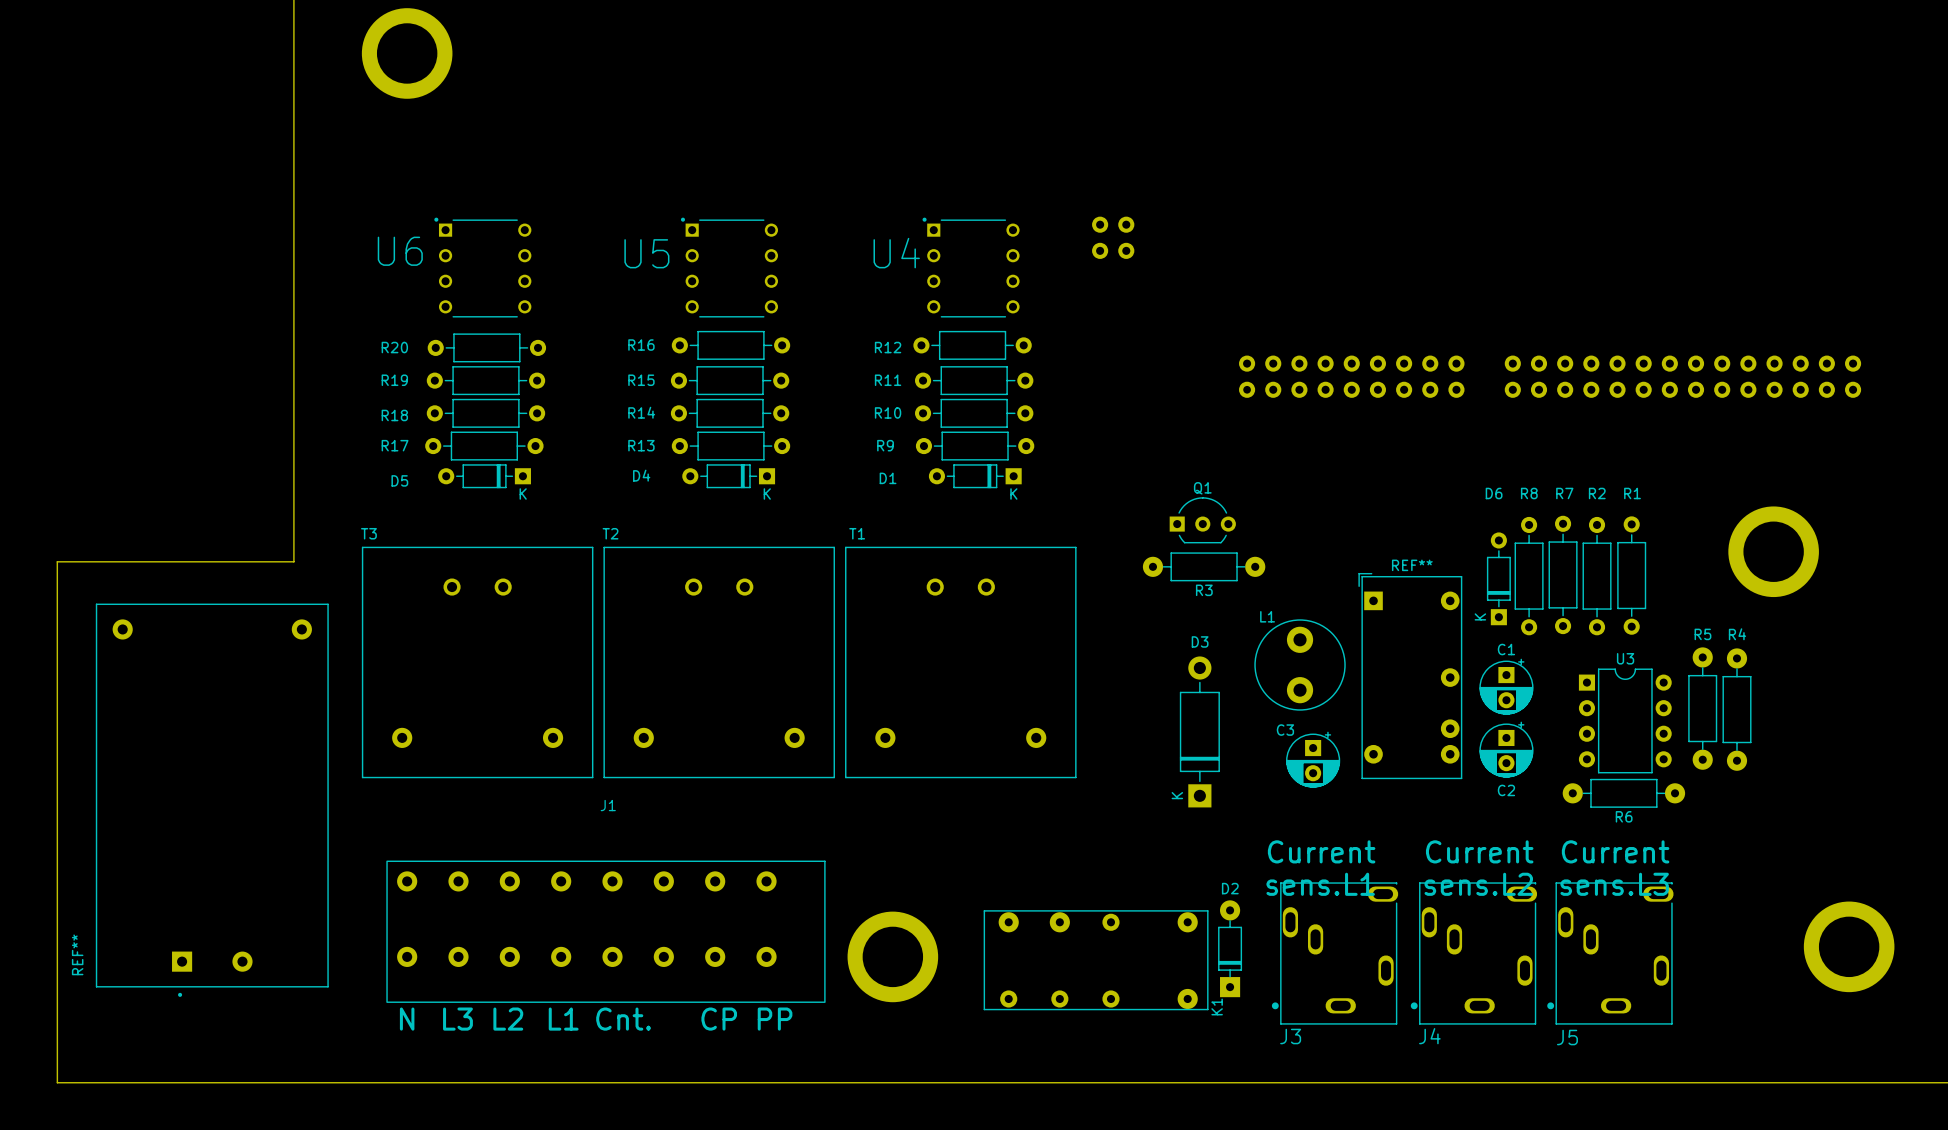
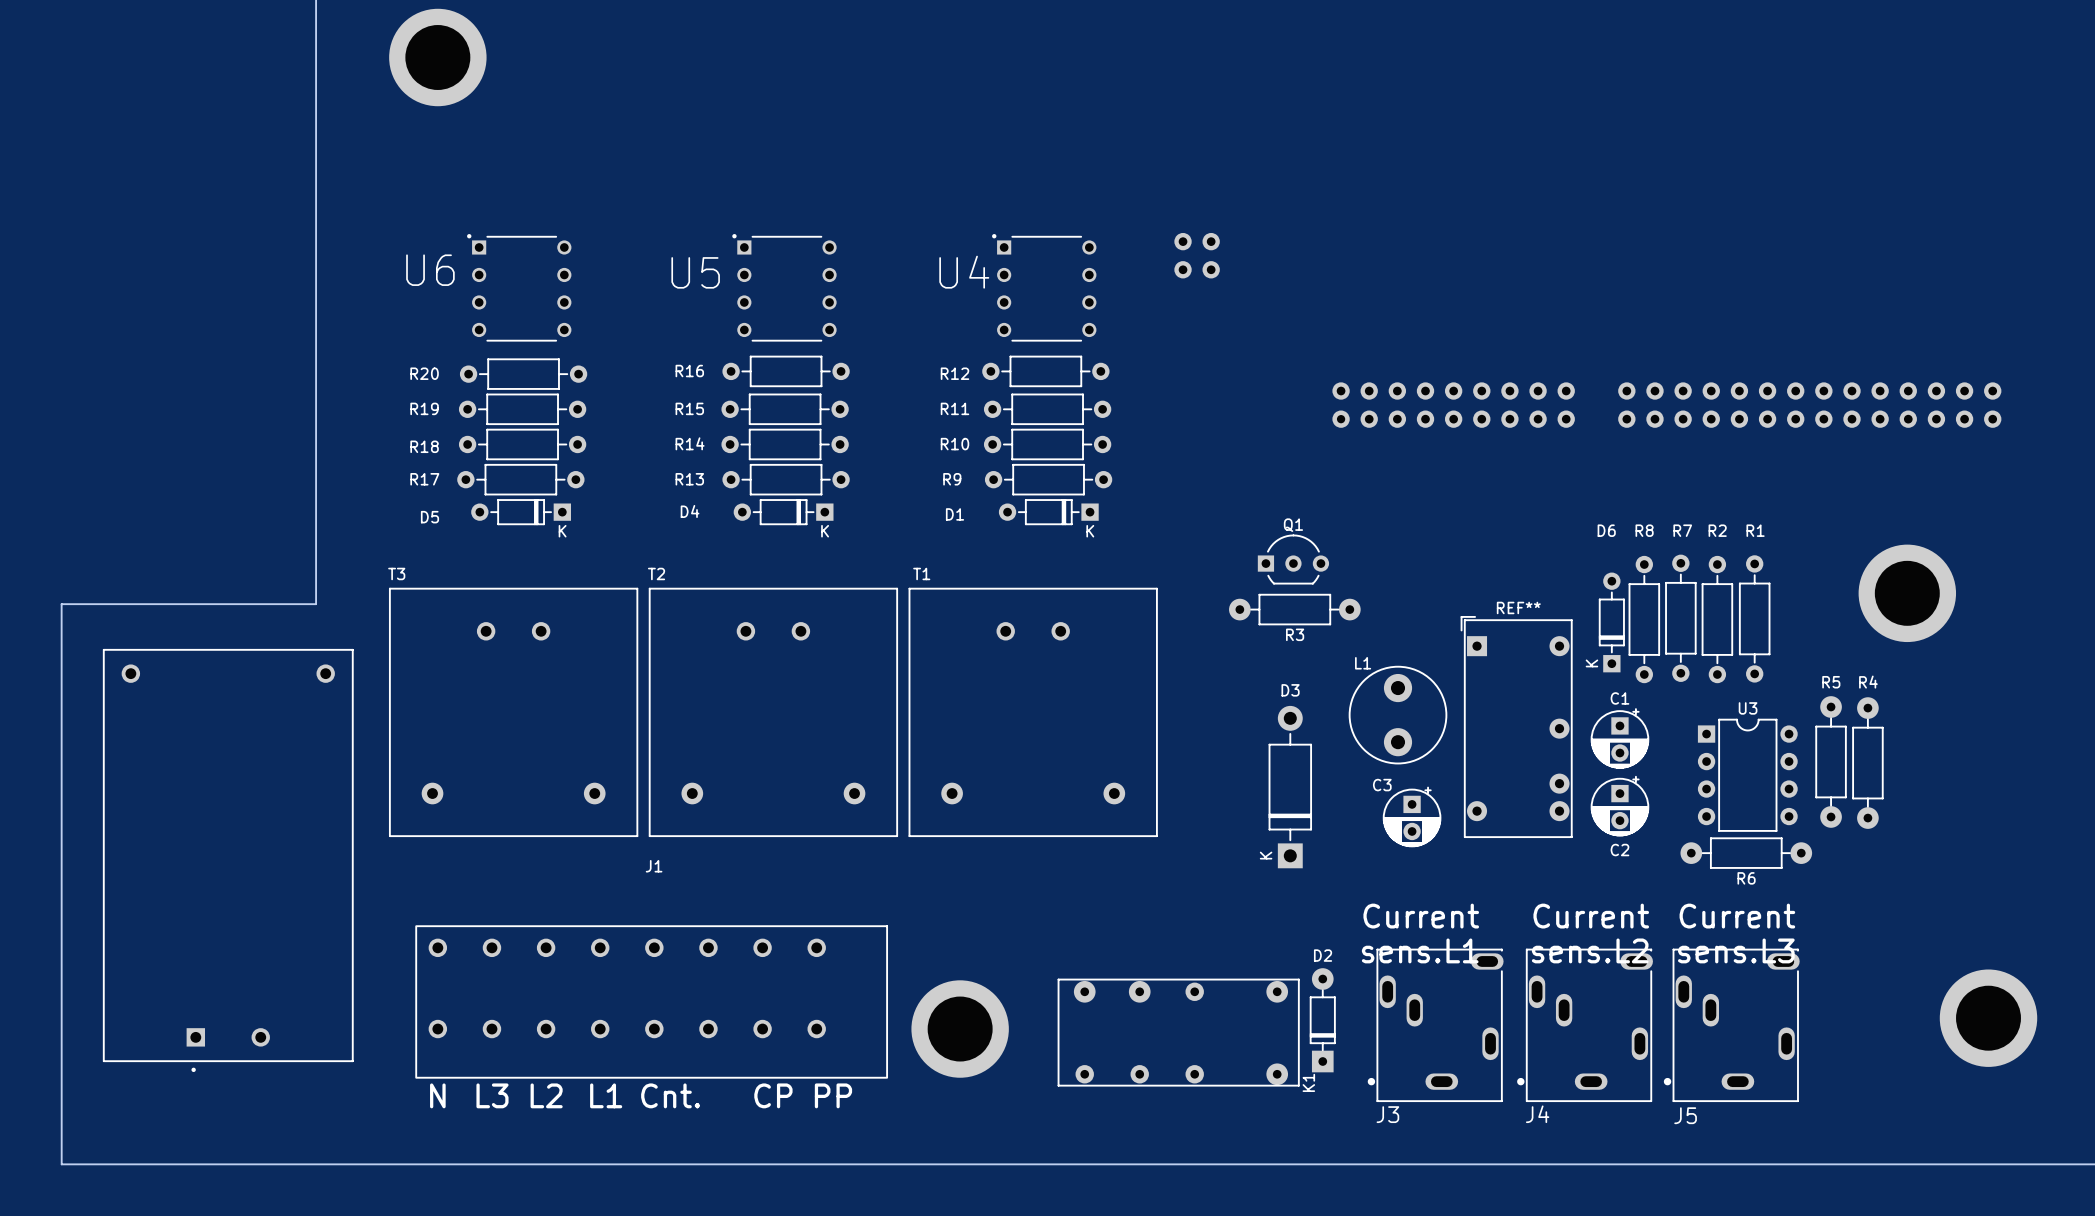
REF**: (212, 800) -> none
part: none -> (228, 860)
J1 footprint: [386, 860, 826, 1003] -> [415, 925, 888, 1079]

